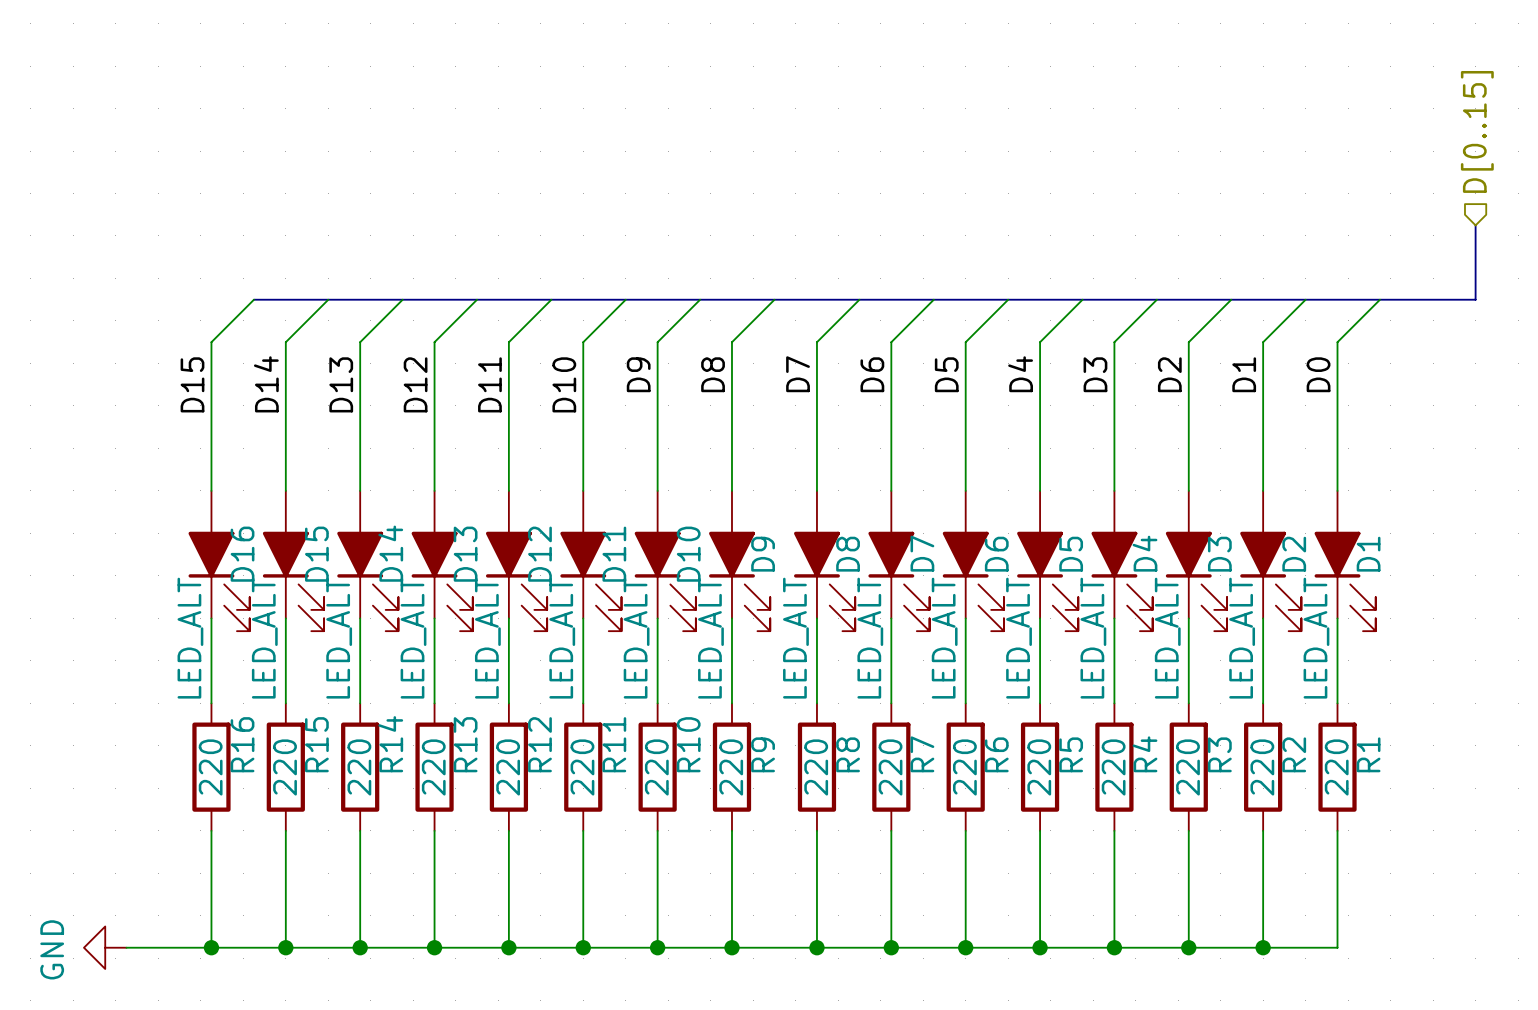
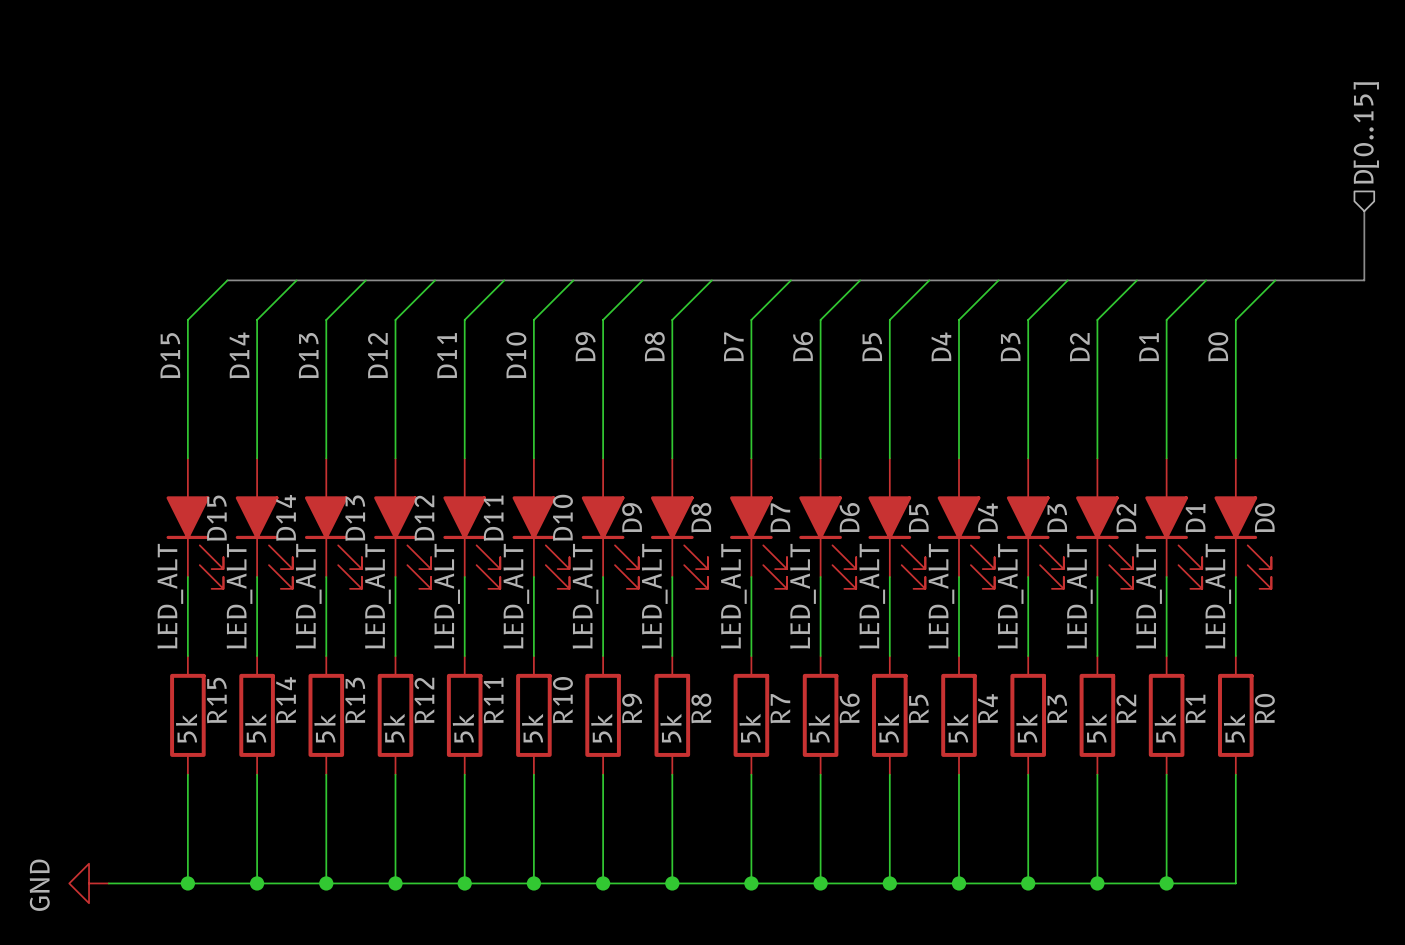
D14 name: D14 (390, 553) -> D13 (355, 518)
D7 name: D7 (922, 553) -> D6 (849, 517)
D4 name: D4 (1144, 553) -> D3 (1057, 518)
D16 name: D16 (242, 554) -> D15 (216, 518)
D15 name: D15 (316, 554) -> D14 (286, 517)
D13 name: D13 (465, 554) -> D12 (424, 518)
D12 name: D12 (539, 554) -> D11 (493, 518)
D11 name: D11 (614, 554) -> D10 (562, 517)
D10 name: D10 (688, 554) -> D9 (632, 517)
D9 name: D9 (763, 554) -> D8 (701, 517)
D8 name: D8 (848, 554) -> D7 (780, 517)
D6 name: D6 (996, 554) -> D5 (918, 518)
D5 name: D5 (1071, 554) -> D4 (987, 517)
D3 name: D3 (1219, 554) -> D2 (1126, 518)
D2 name: D2 (1294, 554) -> D1 (1195, 518)
D1 name: D1 (1368, 554) -> D0 (1264, 517)
R16 name: R16 (242, 744) -> R15 (216, 700)
R15 name: R15 (316, 744) -> R14 (286, 700)
R14 name: R14 (390, 744) -> R13 (355, 700)
R13 name: R13 (465, 744) -> R12 (424, 700)
R12 name: R12 (539, 744) -> R11 (493, 700)
R11 name: R11 (614, 744) -> R10 (562, 700)
R10 name: R10 (688, 744) -> R9 (632, 708)
R9 name: R9 (763, 754) -> R8 (701, 708)
R8 name: R8 (848, 754) -> R7 (780, 708)
R7 name: R7 (922, 754) -> R6 (849, 708)
R6 name: R6 (996, 754) -> R5 (918, 708)
R5 name: R5 (1071, 754) -> R4 (987, 708)
R4 name: R4 (1144, 754) -> R3 (1057, 708)
R3 name: R3 (1219, 754) -> R2 (1126, 708)
R2 name: R2 (1294, 754) -> R1 (1195, 708)
R1 name: R1 (1368, 754) -> R0 (1264, 708)
R16 value: 220 (210, 767) -> 5k (186, 728)
R15 value: 220 (285, 767) -> 5k (255, 728)
R14 value: 220 (359, 767) -> 5k (324, 728)
R13 value: 220 (433, 767) -> 5k (394, 728)
R12 value: 220 (508, 767) -> 5k (463, 728)
R11 value: 220 (582, 767) -> 5k (532, 728)
R10 value: 220 (656, 767) -> 5k (601, 728)
R9 value: 220 (731, 767) -> 5k (670, 728)
R8 value: 220 (816, 767) -> 5k (750, 728)
R7 value: 220 (890, 767) -> 5k (819, 728)
R6 value: 220 (964, 767) -> 5k (888, 728)
R5 value: 220 (1039, 767) -> 5k (957, 728)
R4 value: 220 (1113, 767) -> 5k (1026, 728)
R3 value: 220 (1187, 767) -> 5k (1096, 728)
R2 value: 220 (1262, 767) -> 5k (1165, 728)
R1 value: 220 (1336, 767) -> 5k (1234, 728)

